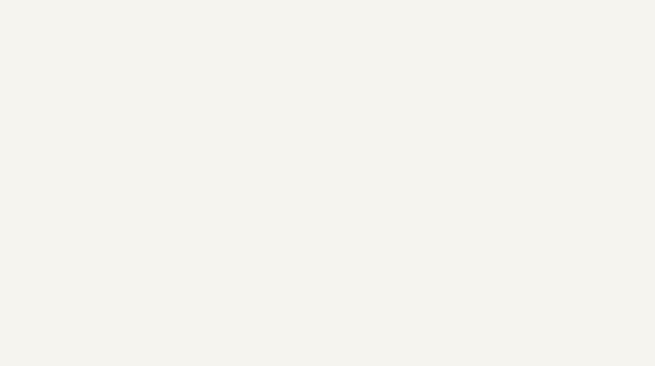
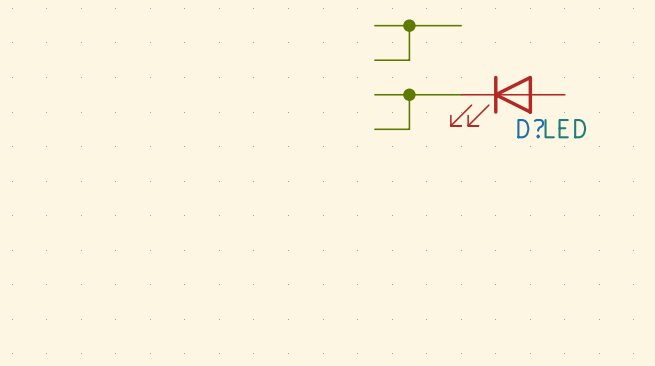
wire: none -> (374, 25) (461, 25)
wire: none -> (409, 25) (409, 60) (374, 60)
junction: none -> (409, 25)
wire: none -> (374, 94) (461, 94)
wire: none -> (409, 94) (409, 129) (374, 129)
junction: none -> (409, 94)
D?: none -> LED (507, 100)

